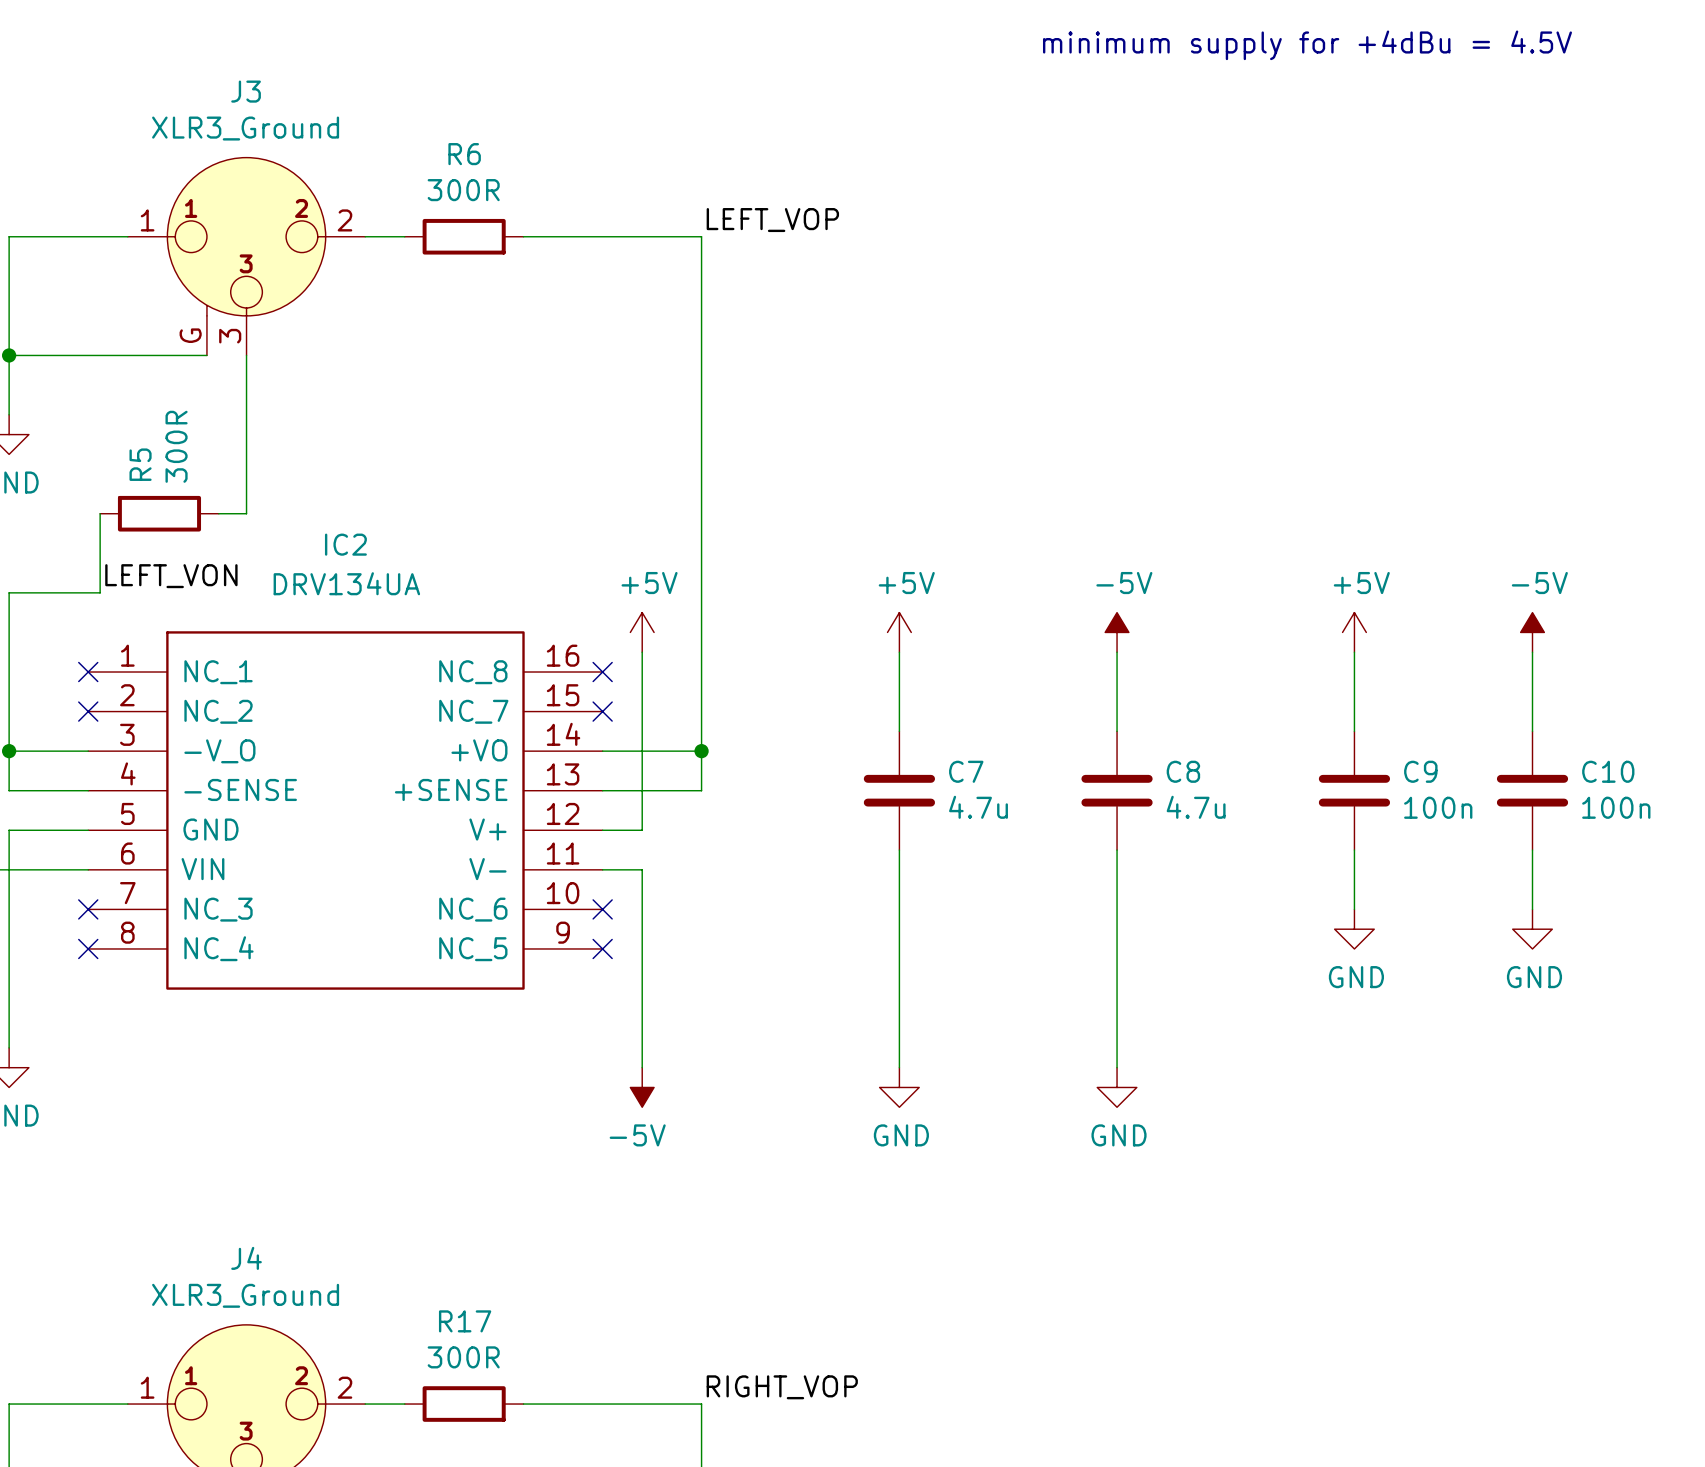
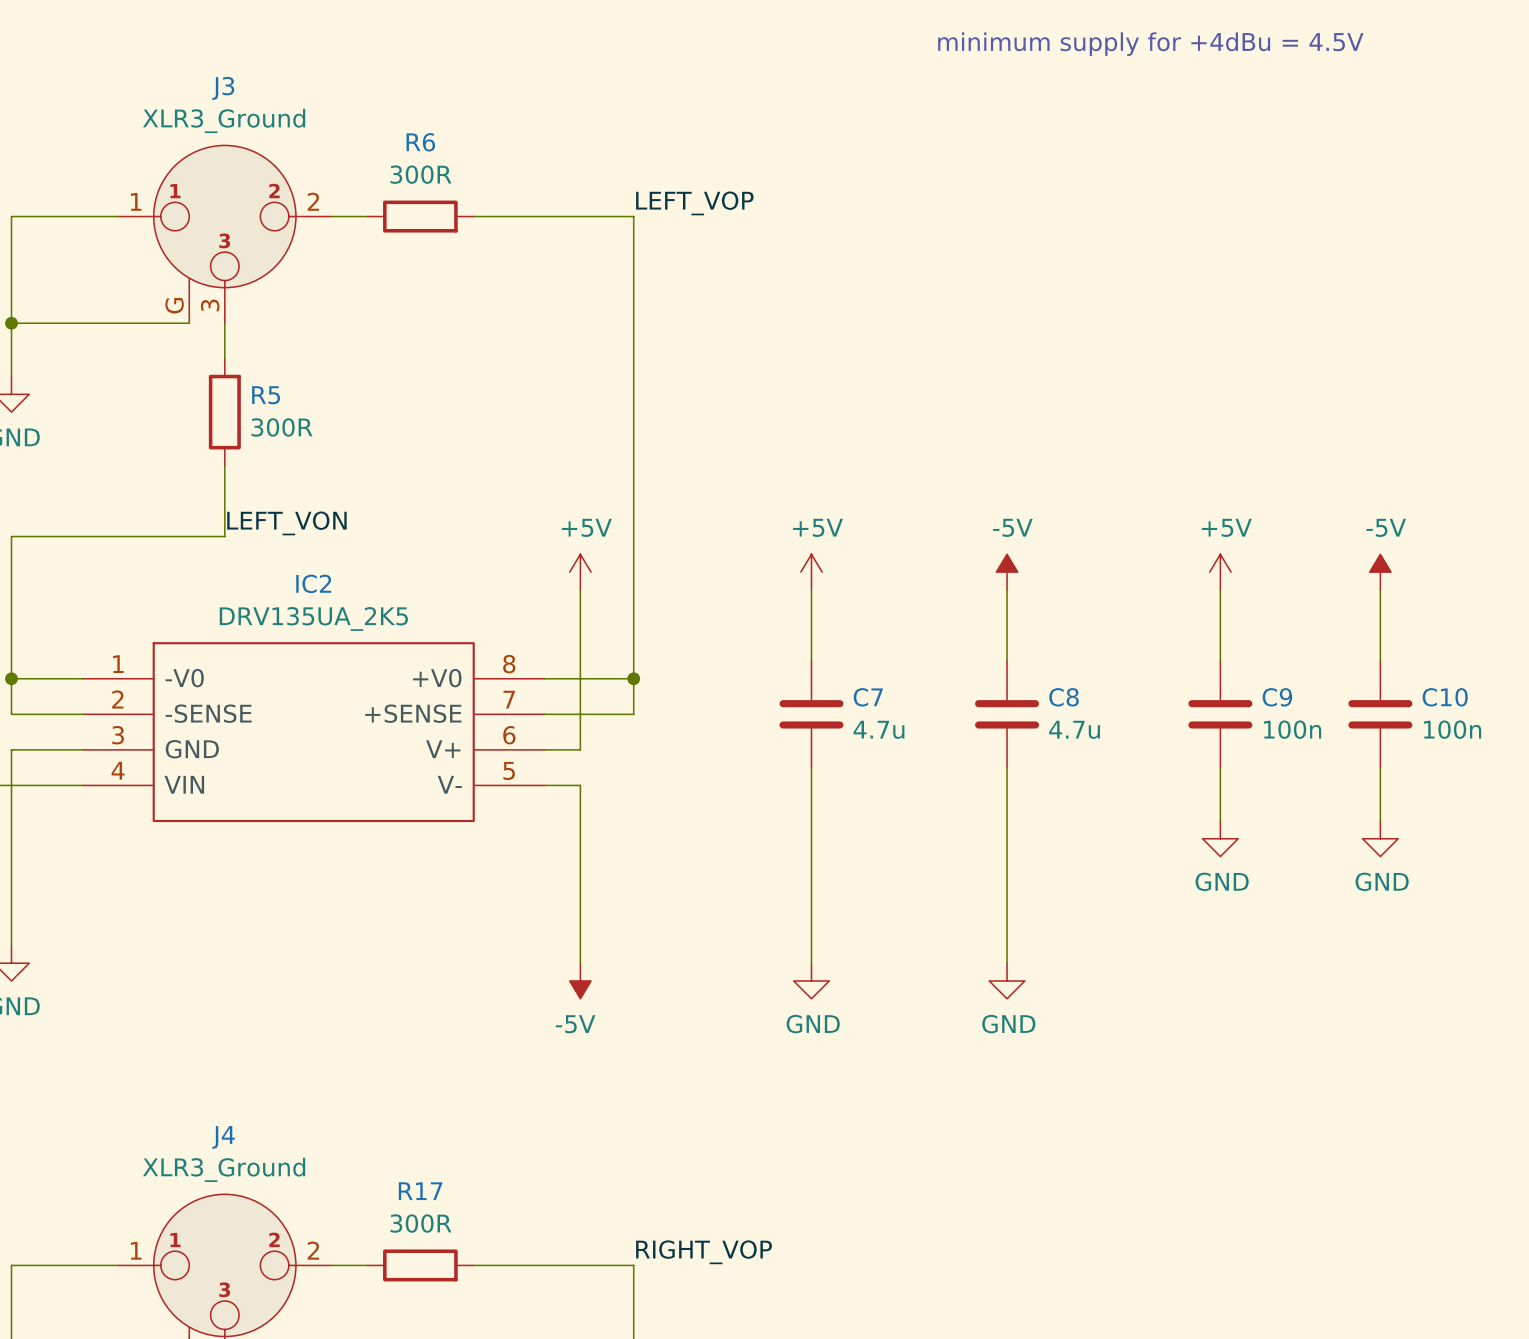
wire: (246, 395) (246, 513) (218, 513) -> none
wire: (100, 513) (100, 592) -> (224, 465) (224, 536) (93, 536)
R5 rotation: 0° (159, 513) -> 90° clockwise (224, 412)
R5 position: (159, 513) -> (224, 412)
IC2 name position: IC2 (345, 544) -> IC2 (313, 583)
label position: LEFT_VON (171, 576) -> LEFT_VON (286, 523)
IC2 value: DRV134UA (346, 583) -> DRV135UA_2K5 (313, 618)
IC2 symbol: [88, 631, 603, 990] -> [82, 642, 545, 823]
no-connect mark: (88, 672) -> none
no-connect mark: (602, 672) -> none
no-connect mark: (88, 711) -> none
no-connect mark: (602, 711) -> none
no-connect mark: (88, 909) -> none
no-connect mark: (602, 909) -> none
no-connect mark: (88, 948) -> none
no-connect mark: (602, 948) -> none

